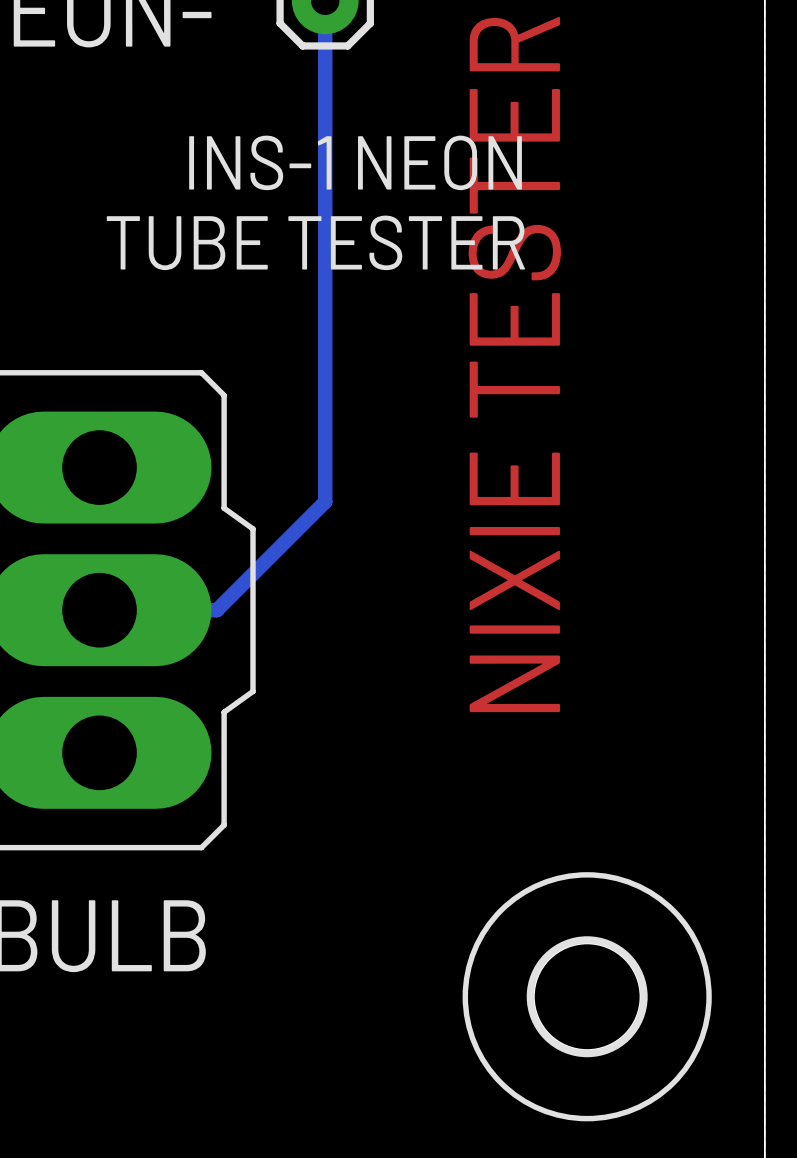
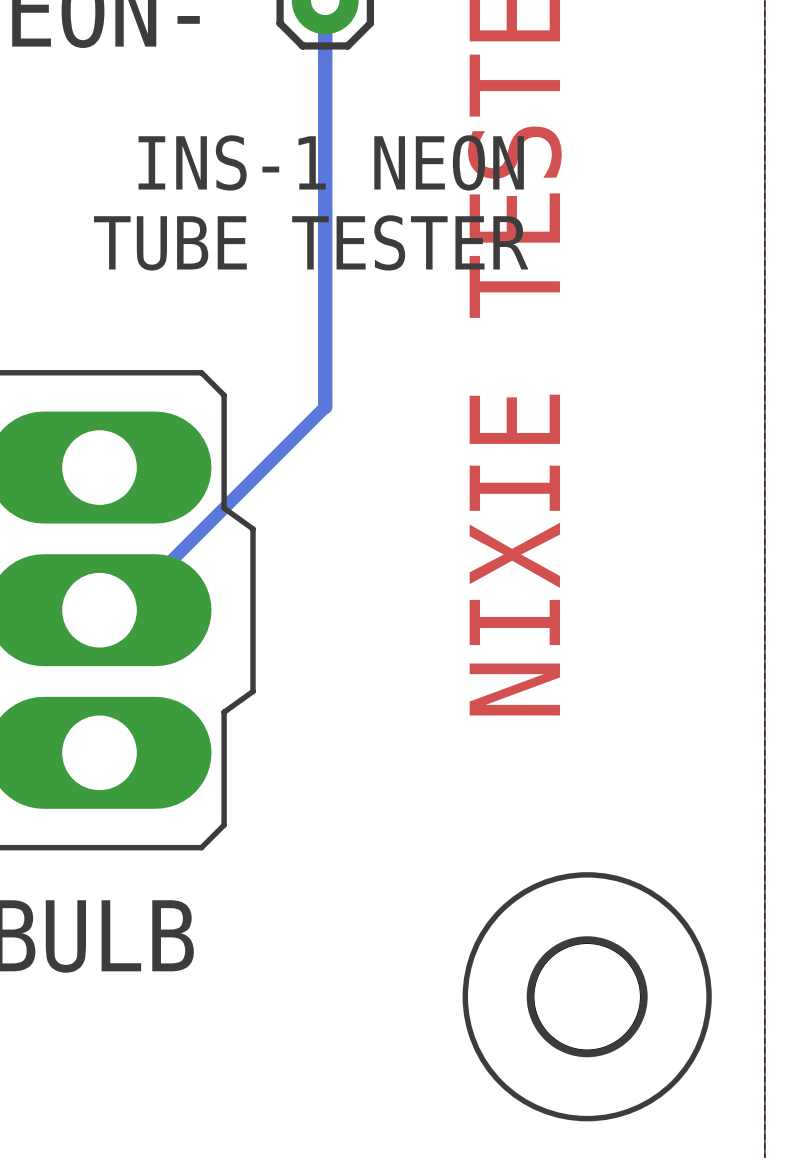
bottom track: (325, 407) (325, 501) (216, 610) (122, 610) -> (325, 407) (122, 610)

